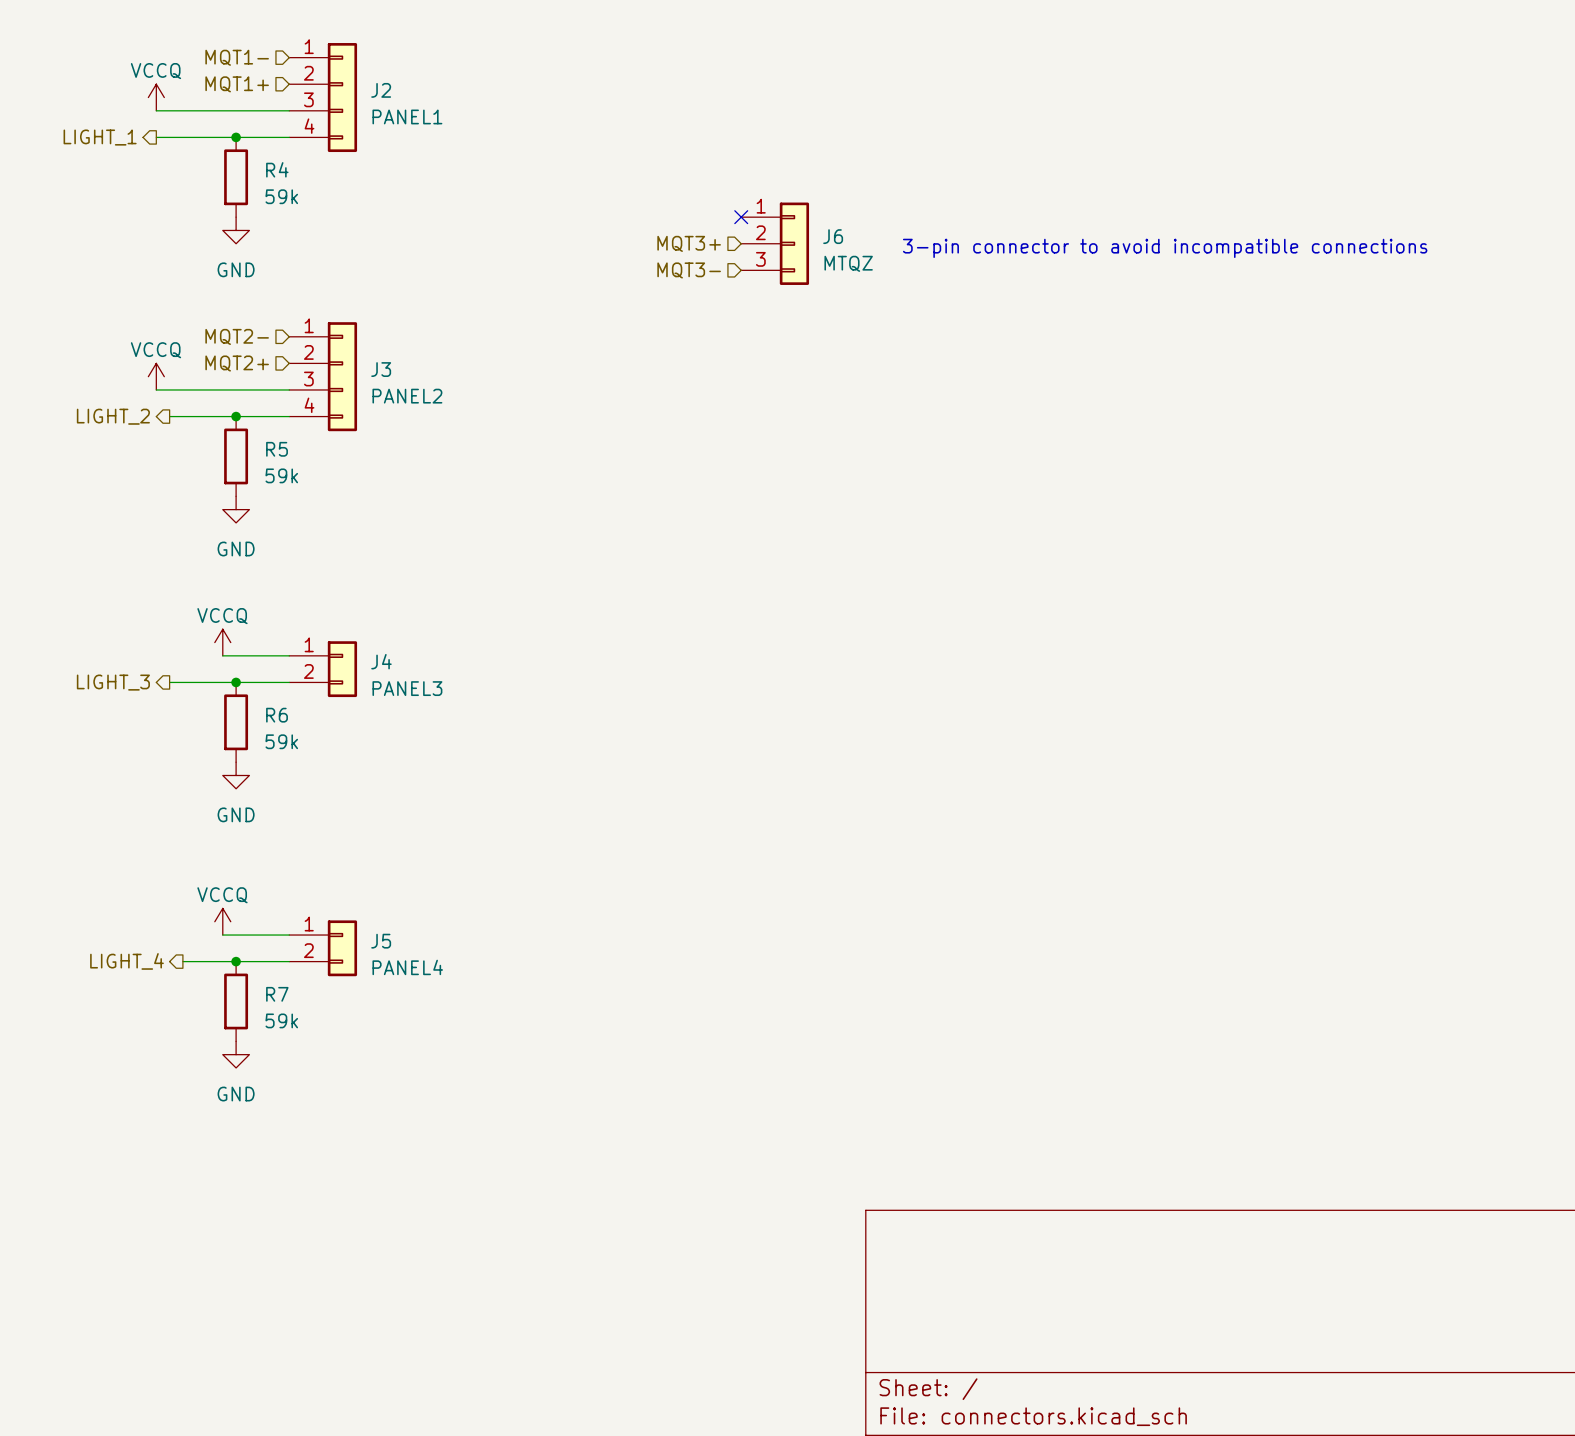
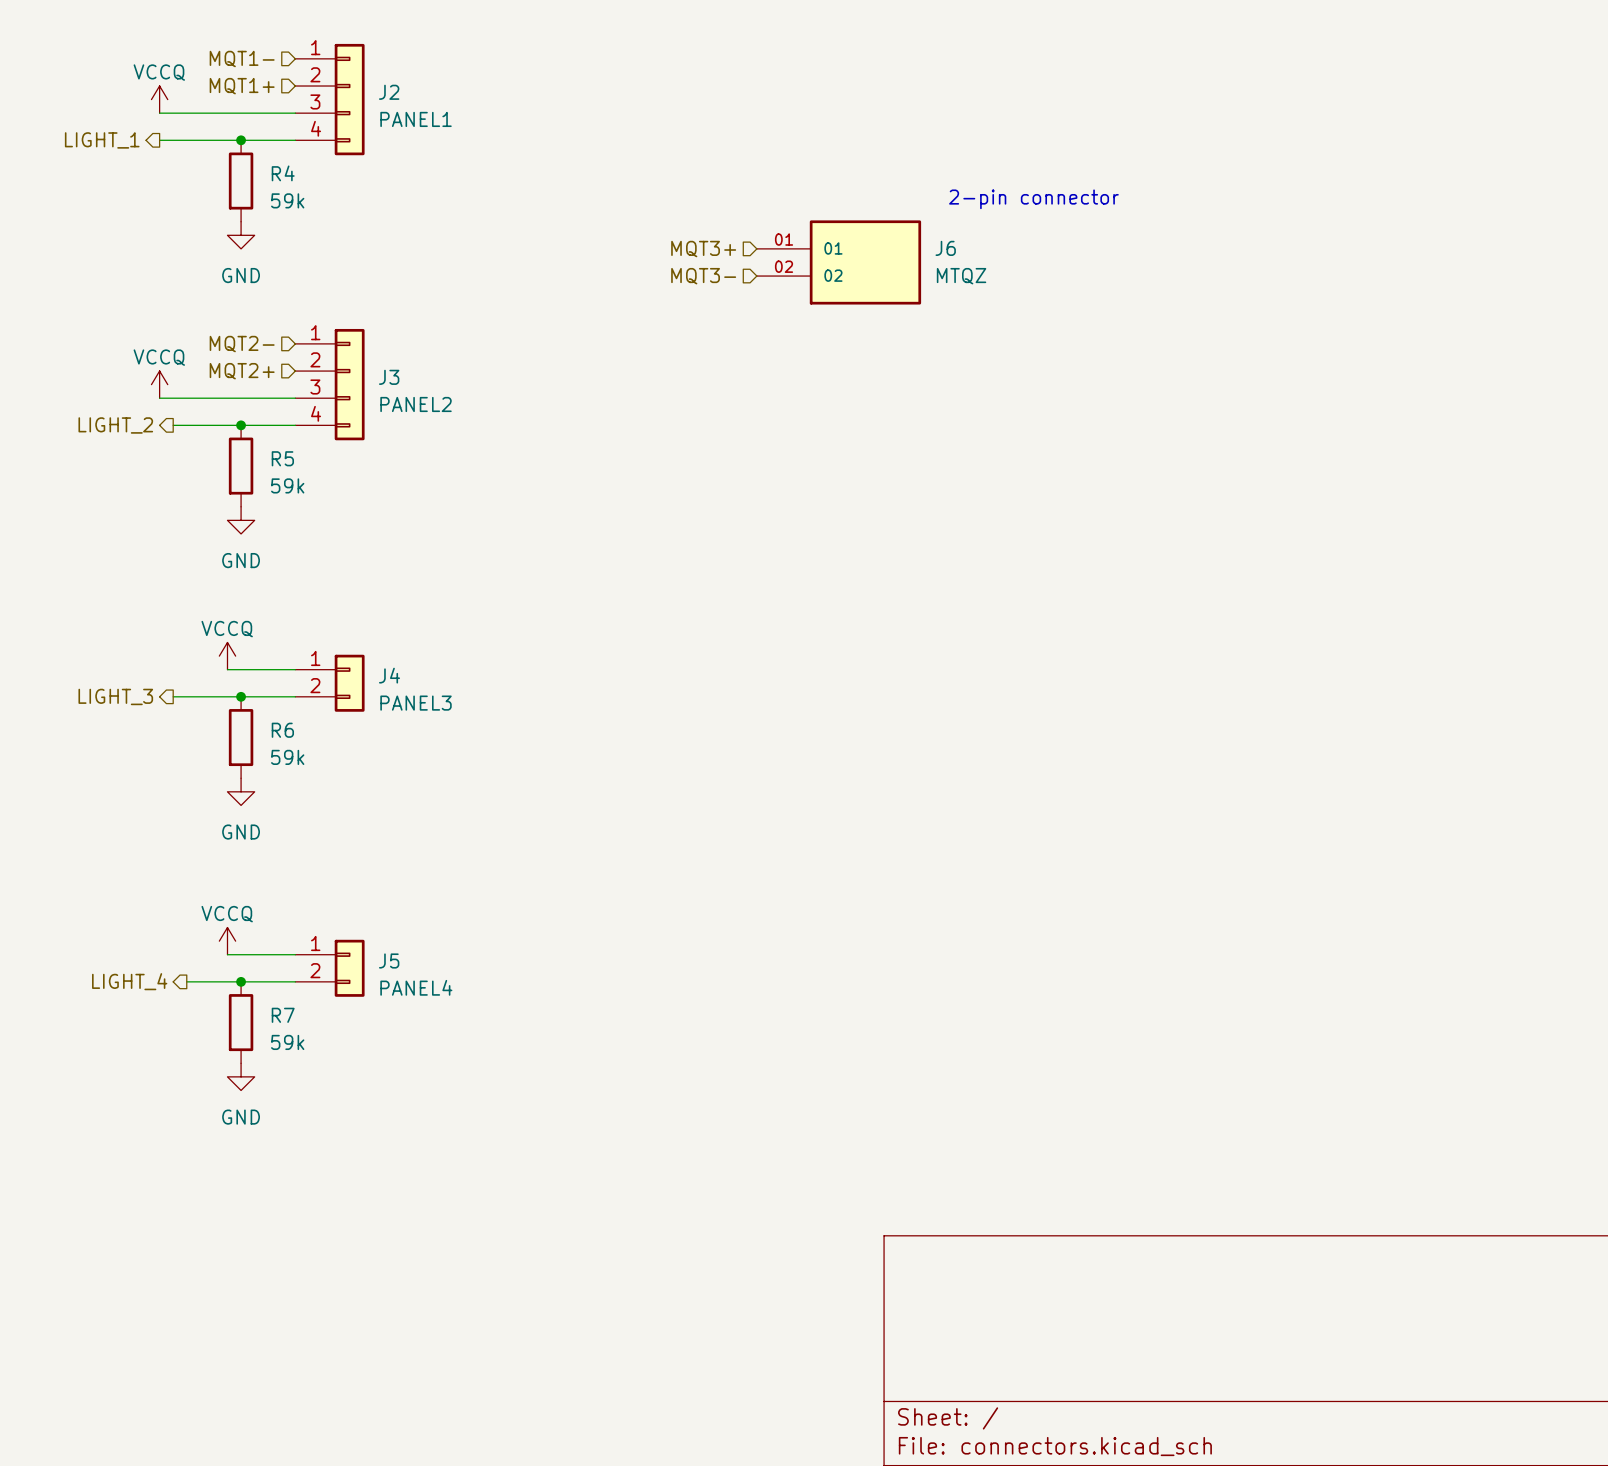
text: none -> 2-pin connector (1033, 199)
J6 symbol: [741, 202, 810, 285] -> [756, 220, 922, 305]
no-connect mark: (741, 217) -> none
J6 name position: J6 (833, 236) -> J6 (945, 248)
text: 3-pin connector to avoid incompatible connections (1165, 248) -> none
J6 value position: MTQZ (848, 263) -> MTQZ (961, 276)

